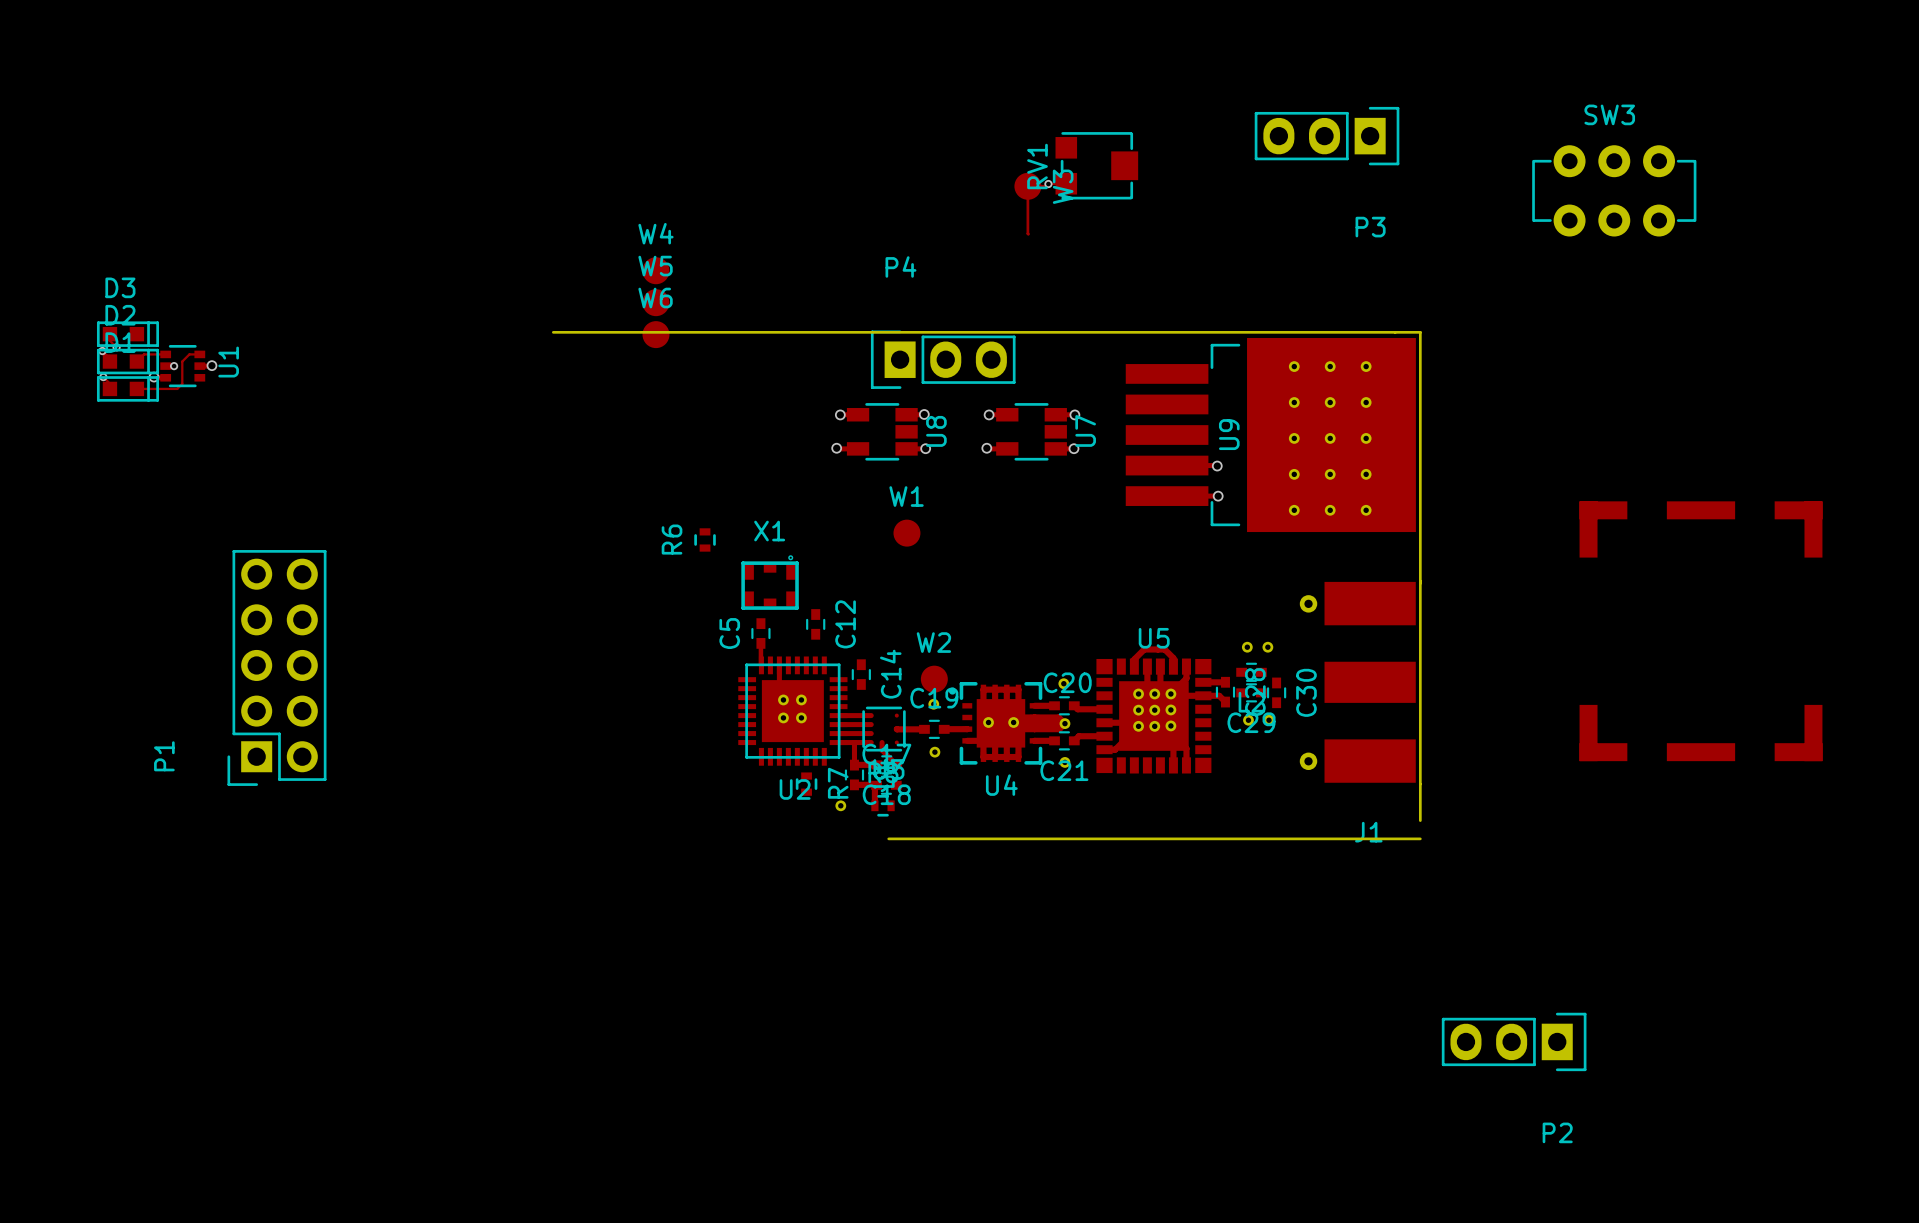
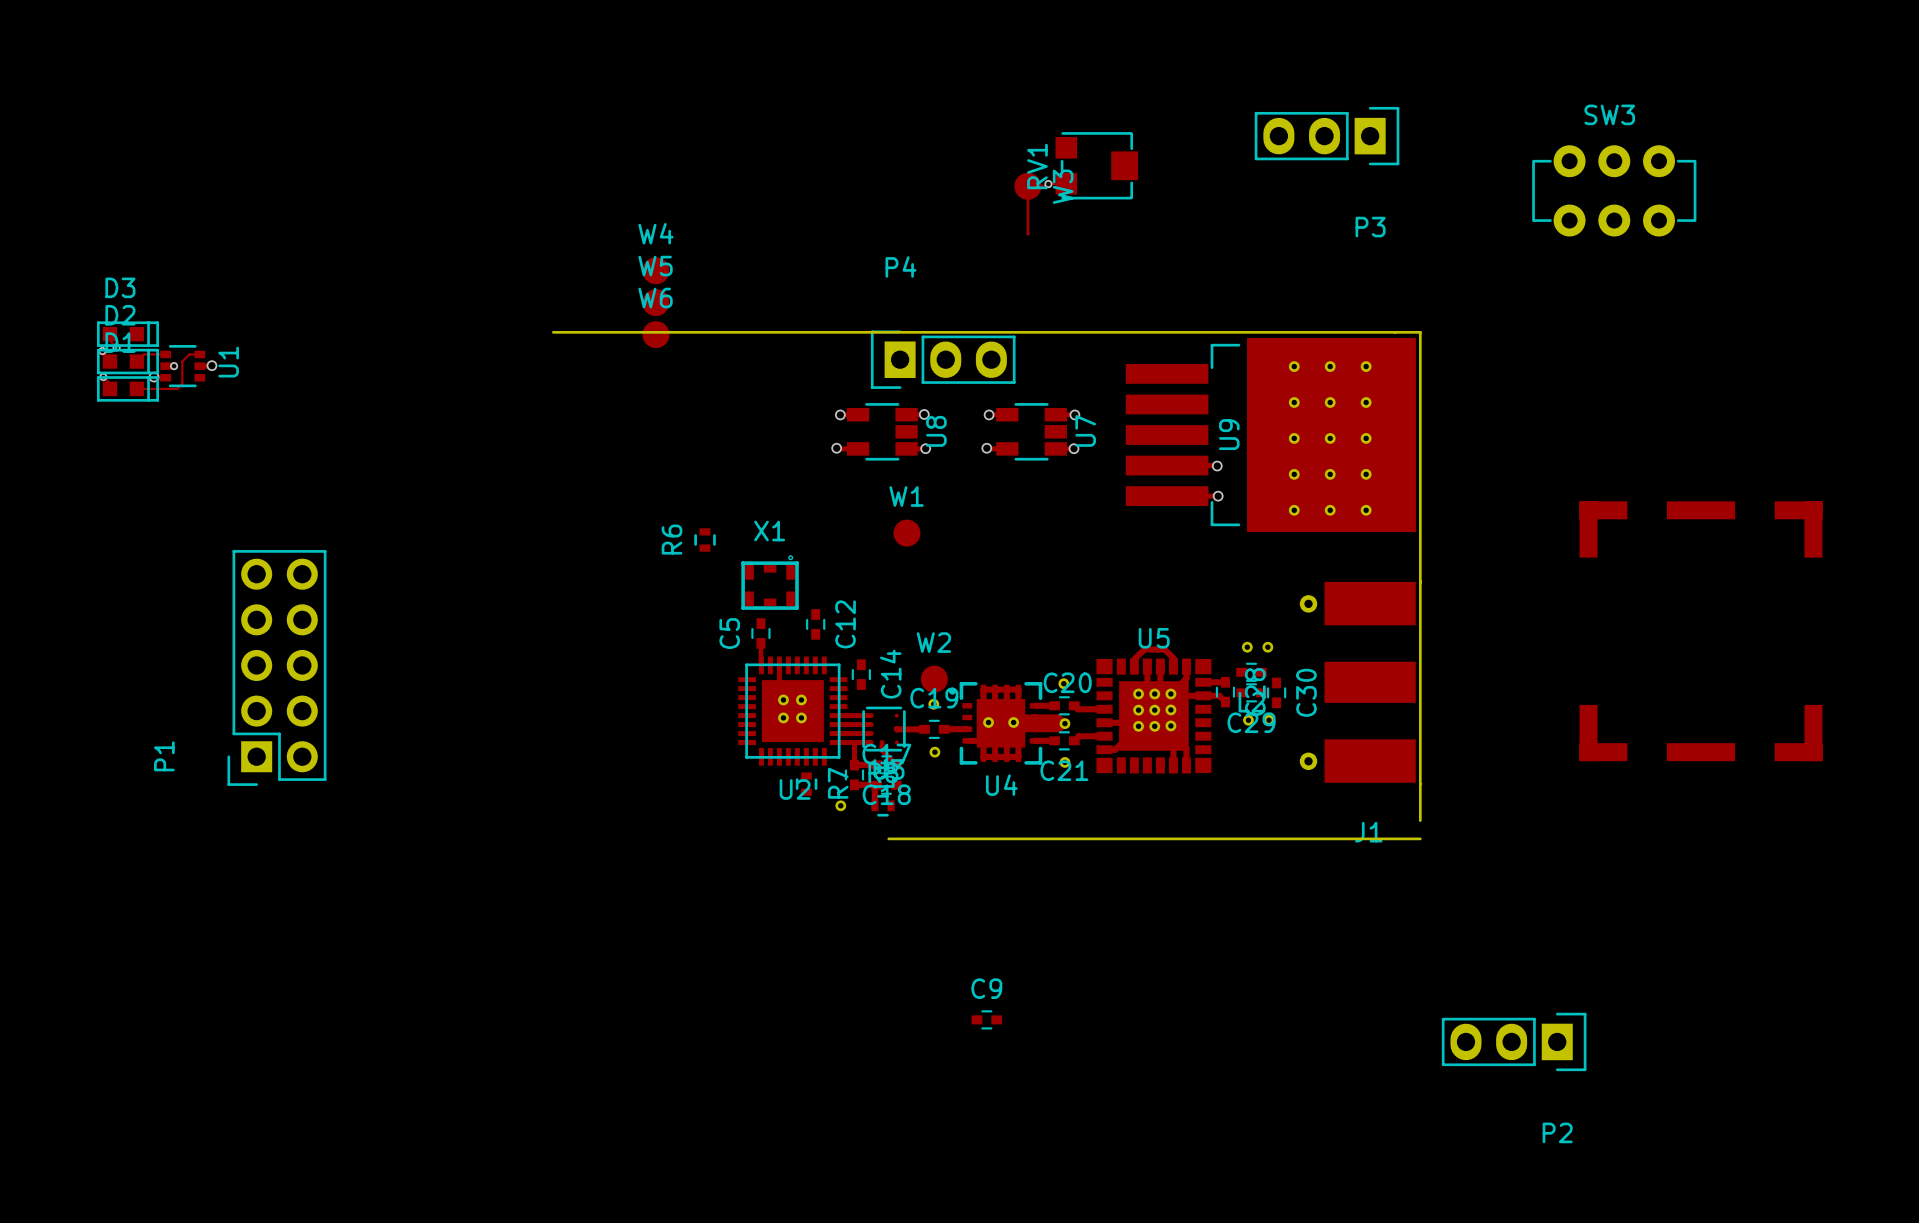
C9: none -> (986, 1019)

